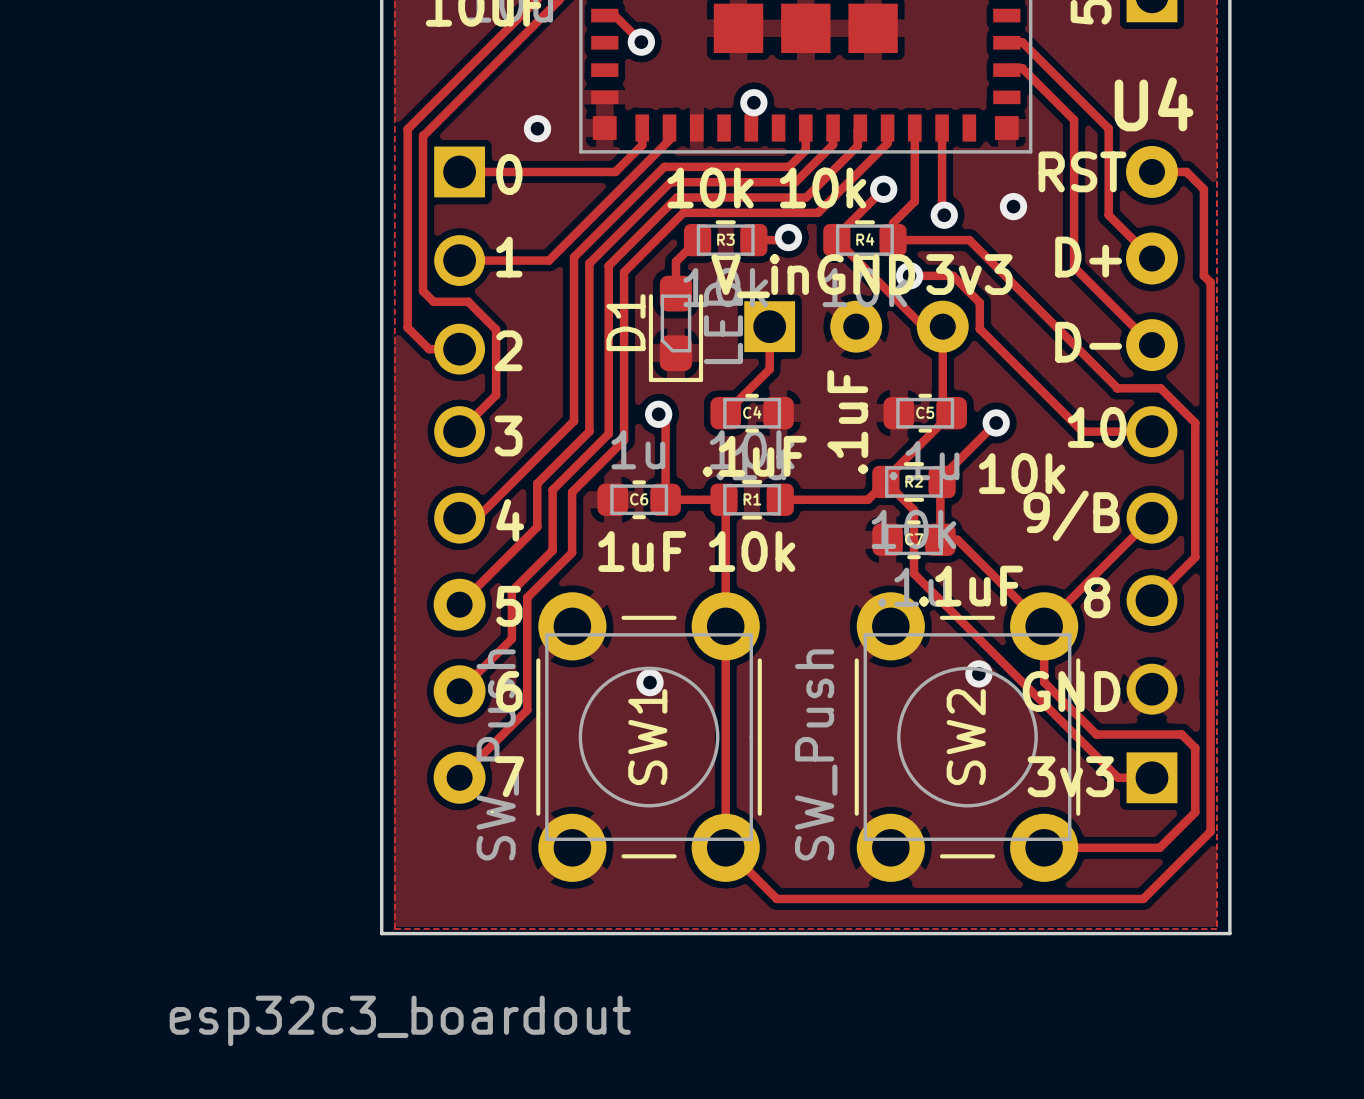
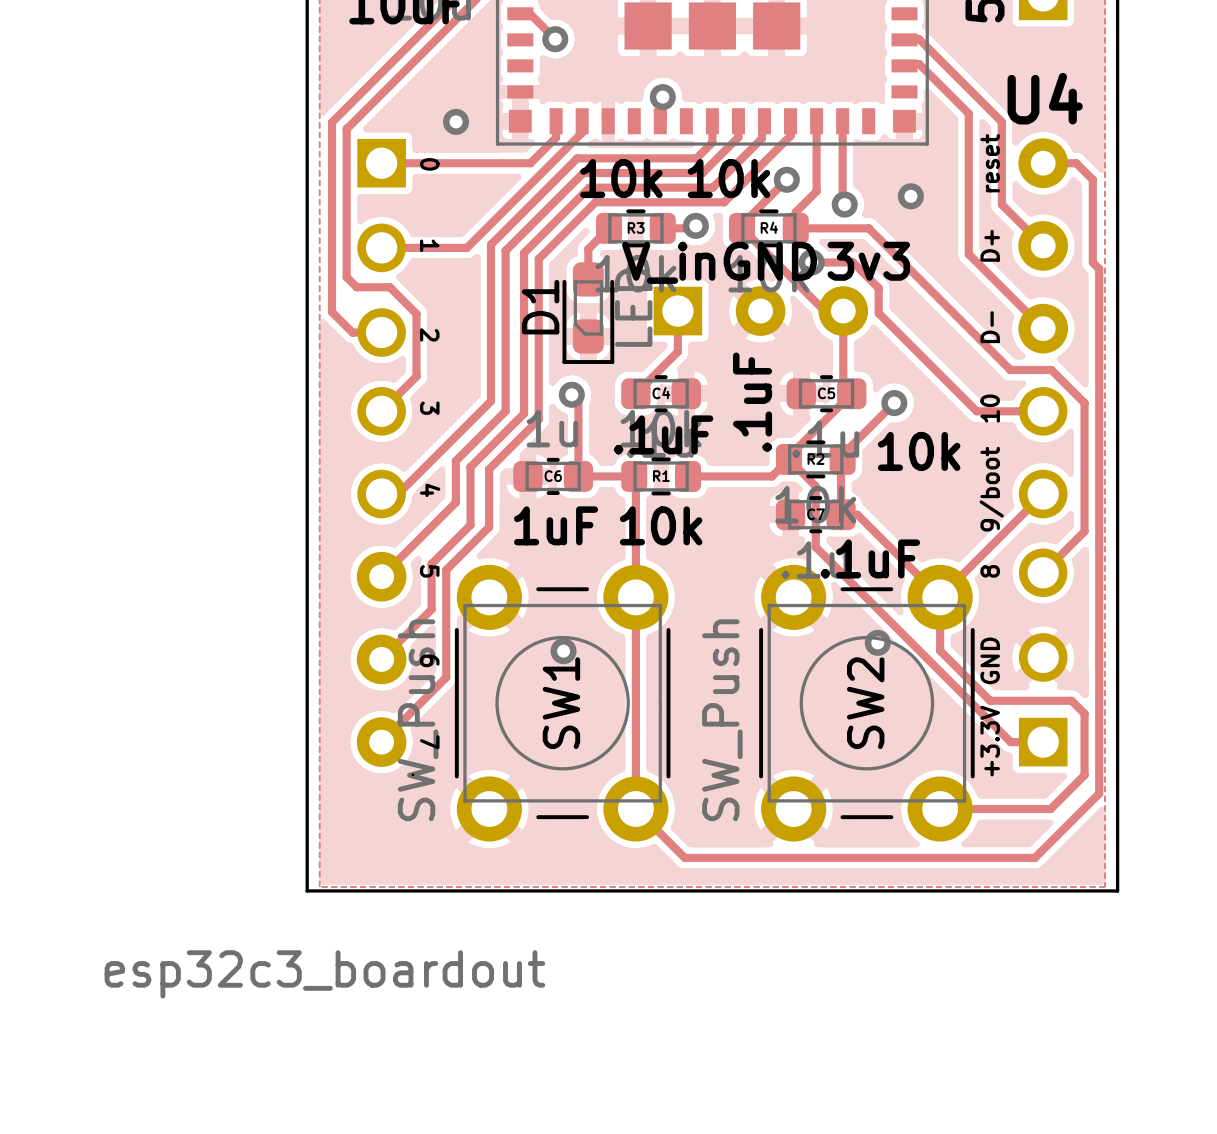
part footprint: [433, 146, 1178, 804] -> [356, 138, 1069, 767]

